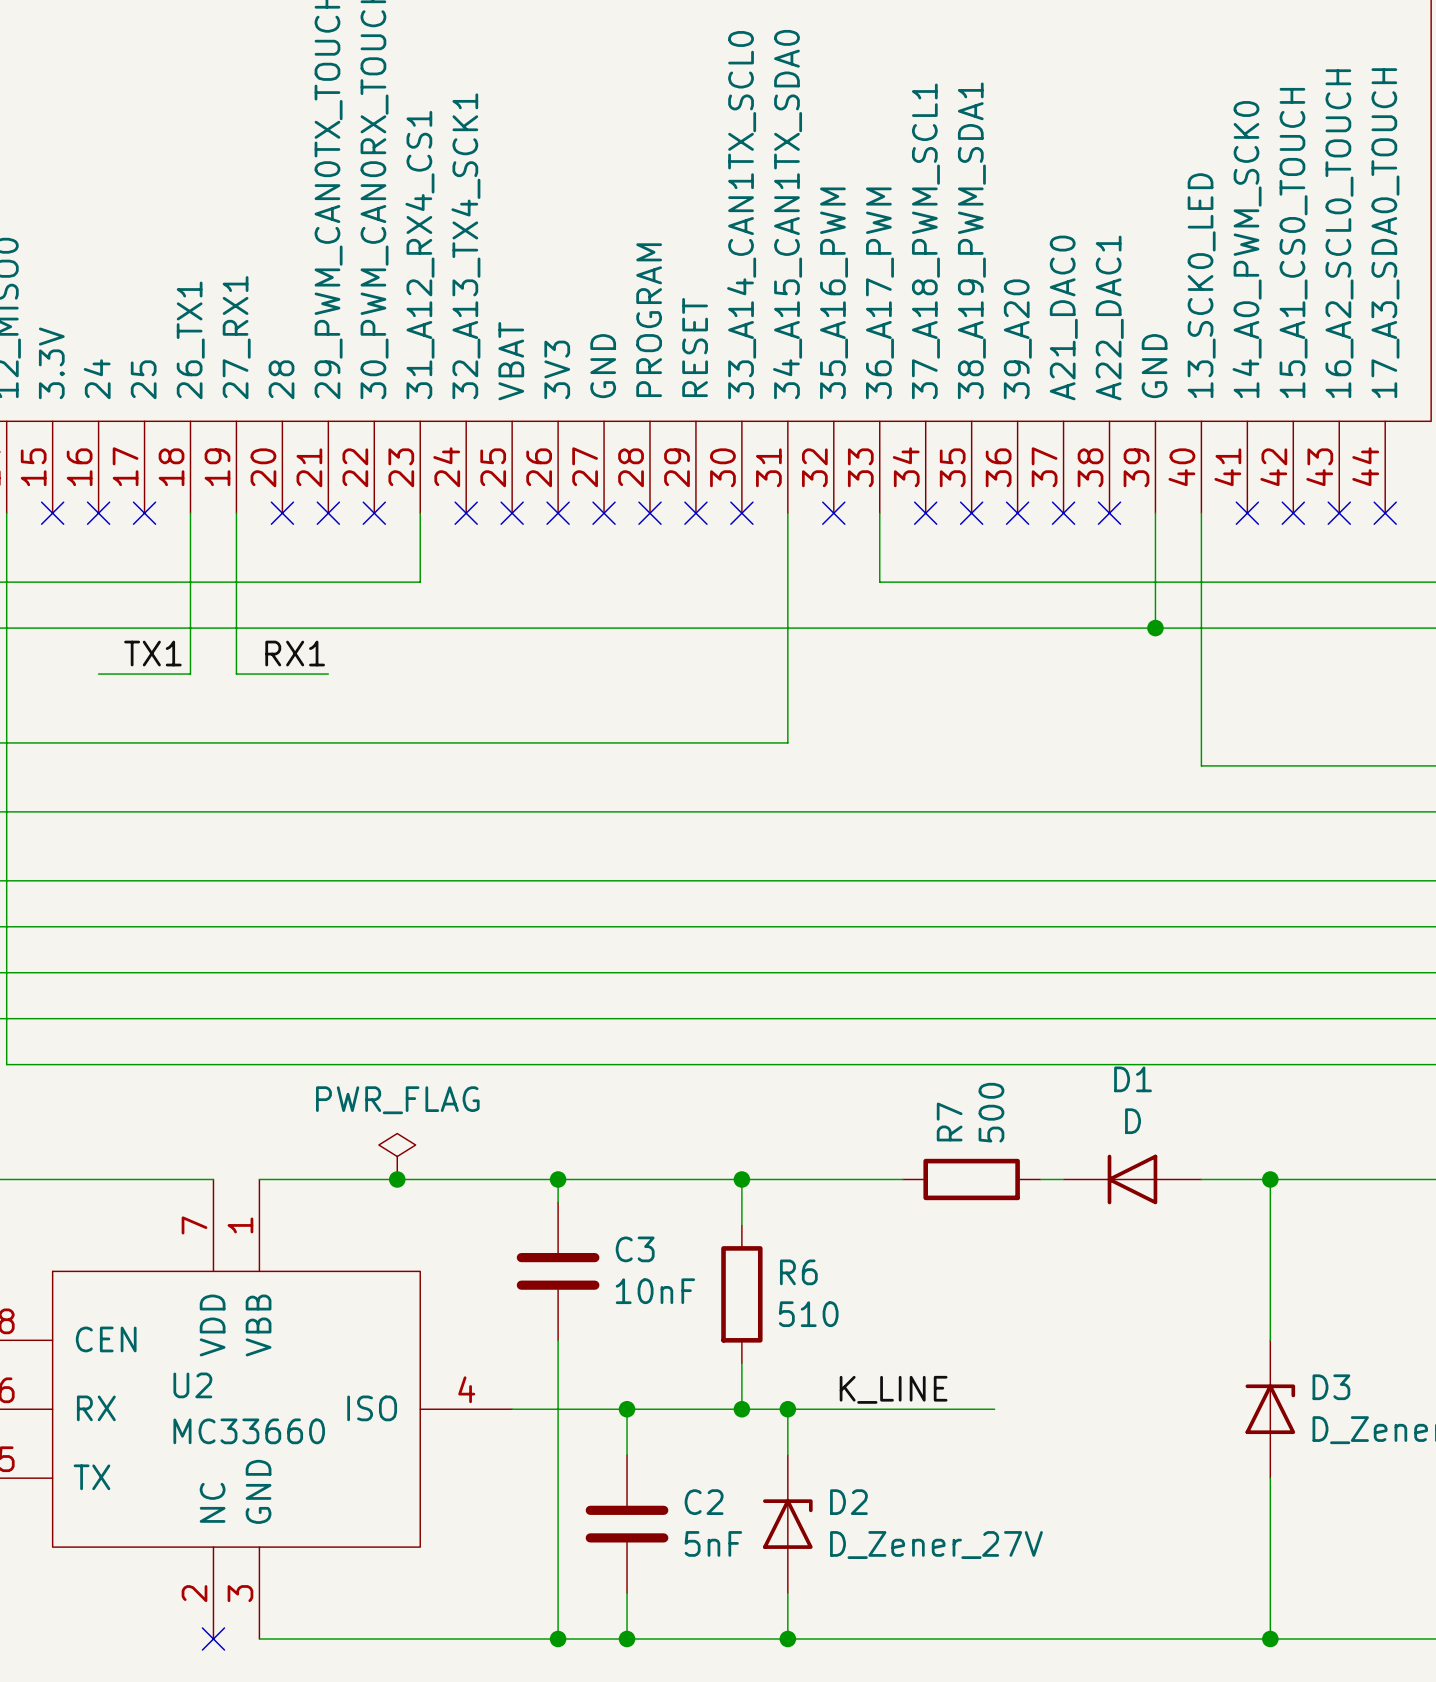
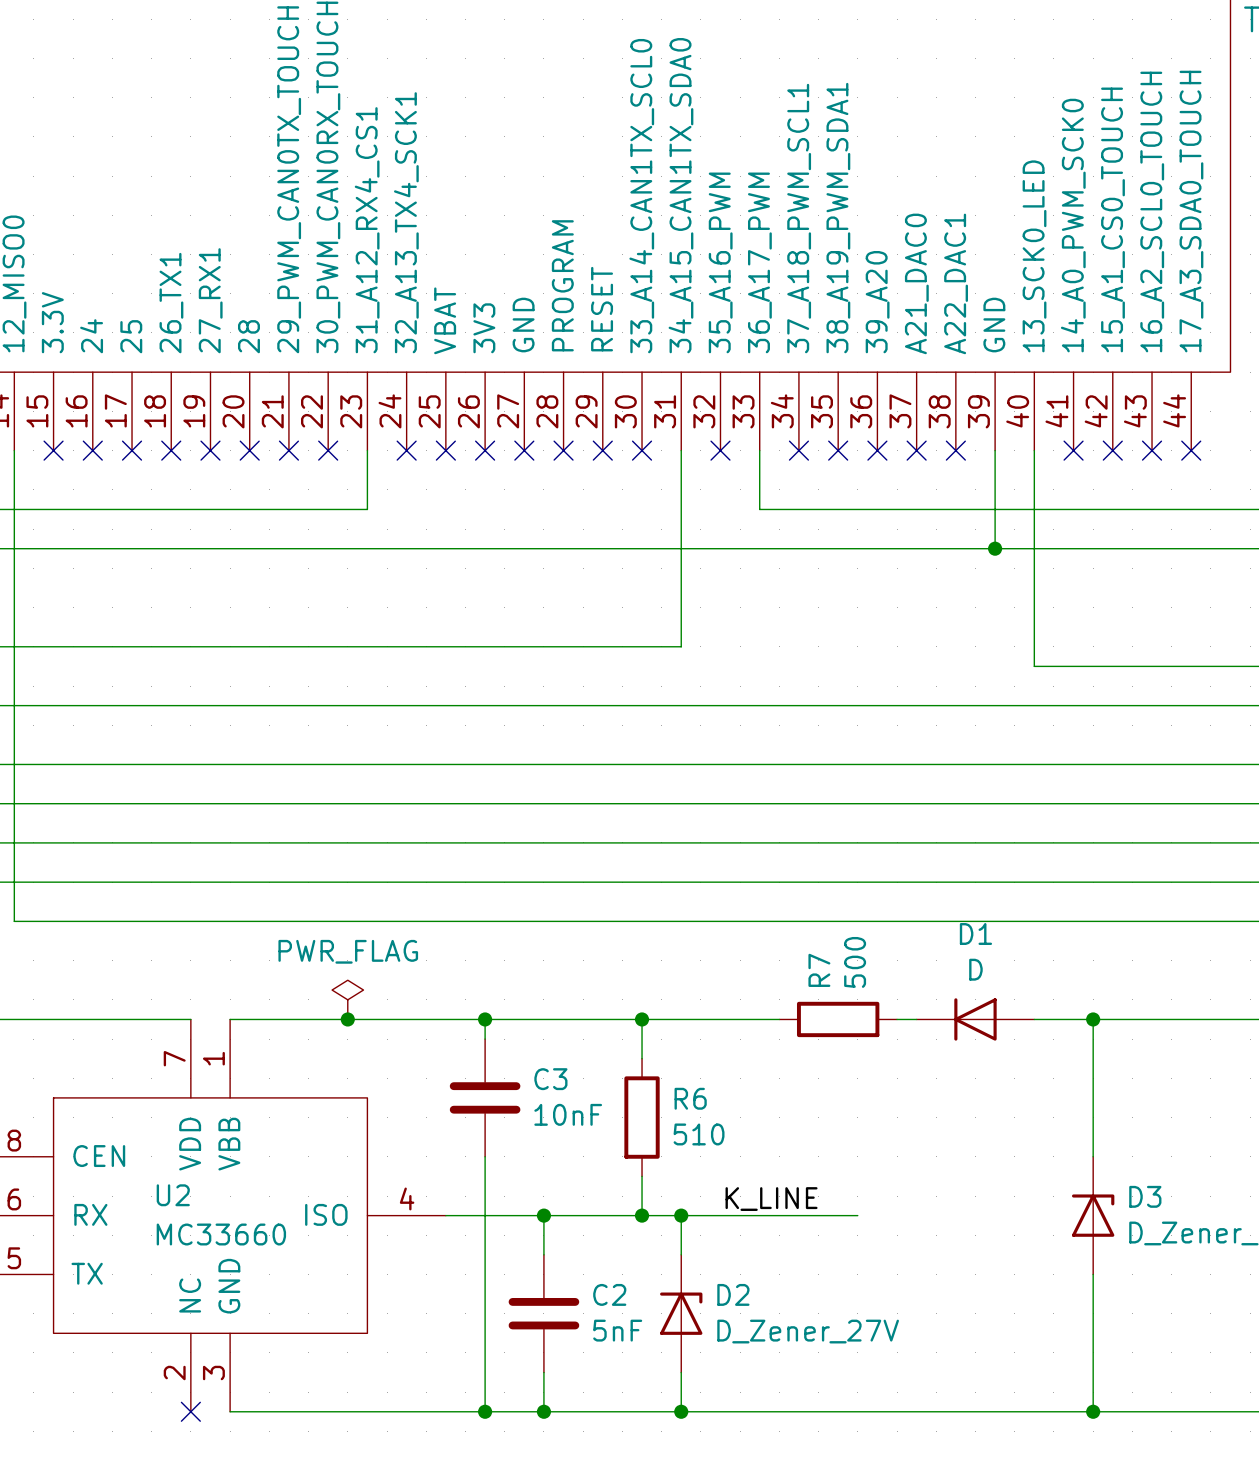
wire: (190, 513) (190, 674) (98, 674) -> none
no-connect mark: none -> (171, 450)
wire: (236, 513) (236, 674) (328, 674) -> none
no-connect mark: none -> (210, 450)
label: TX1 (152, 653) -> none
label: RX1 (295, 653) -> none

